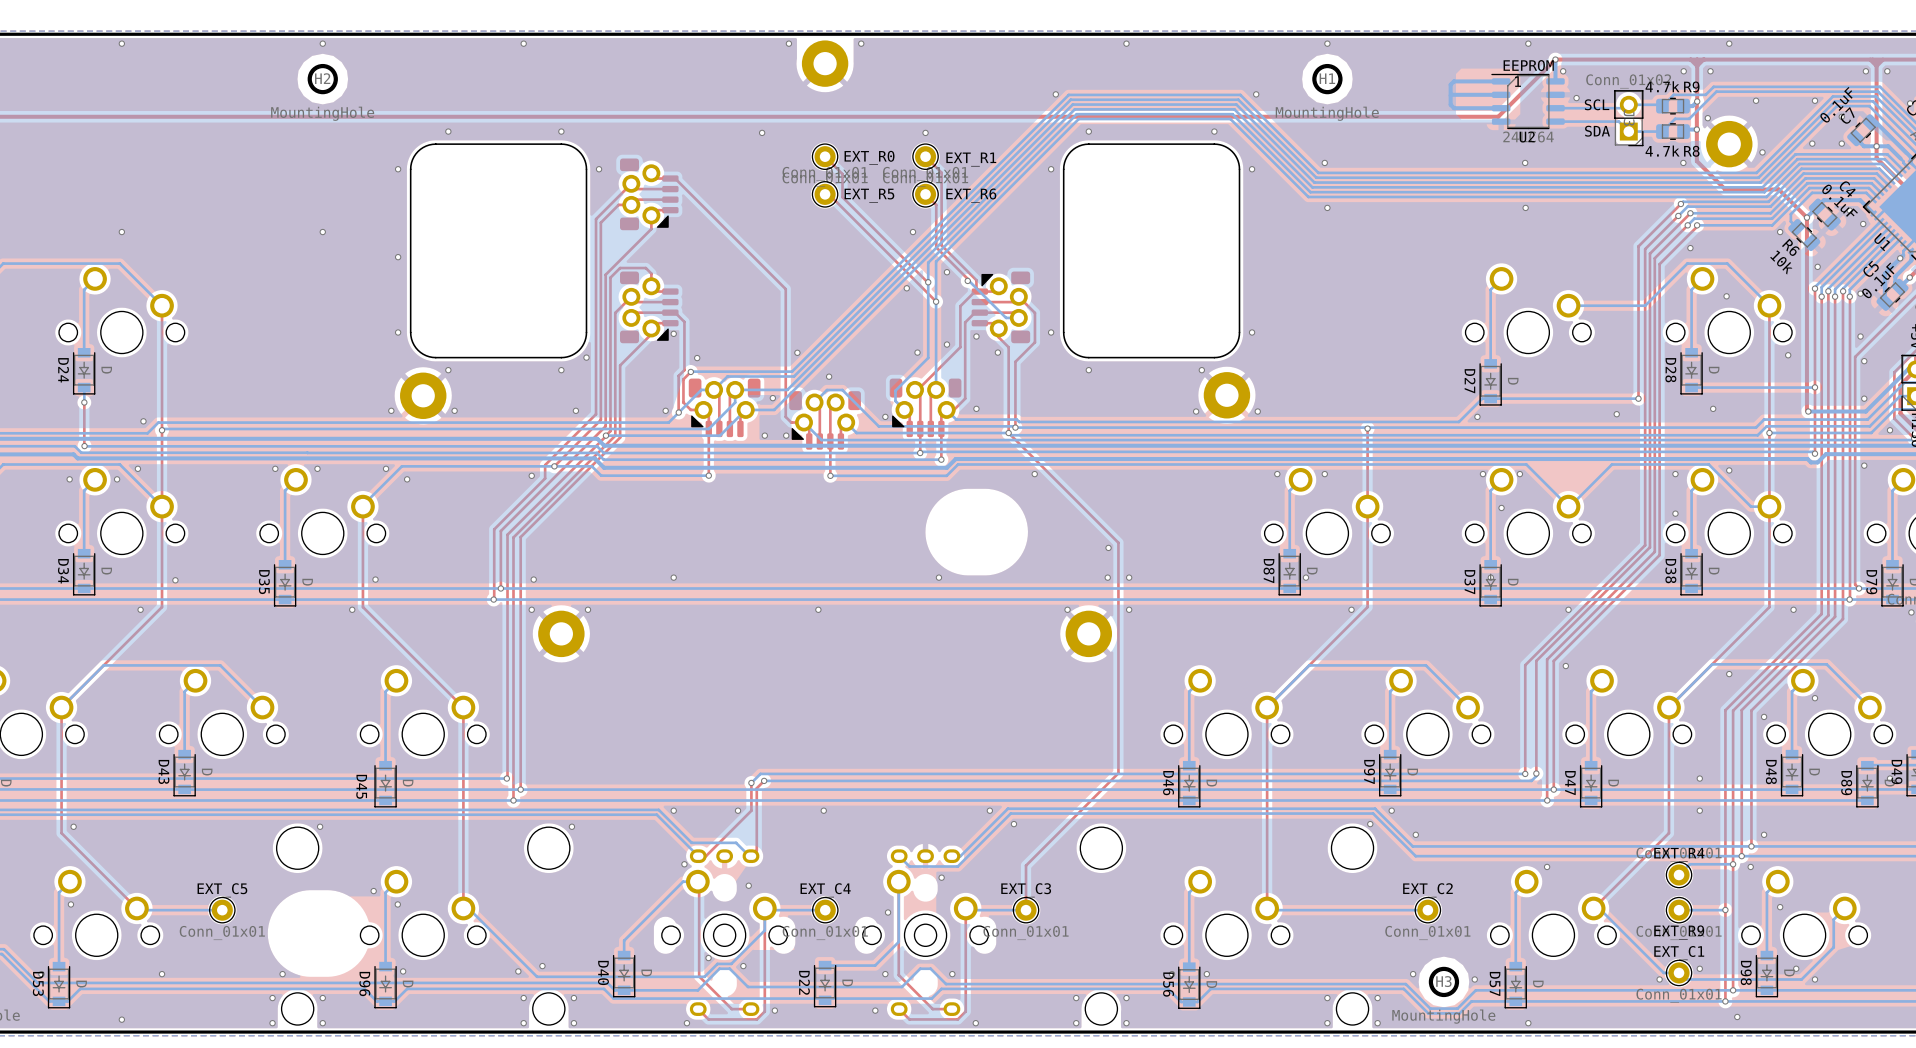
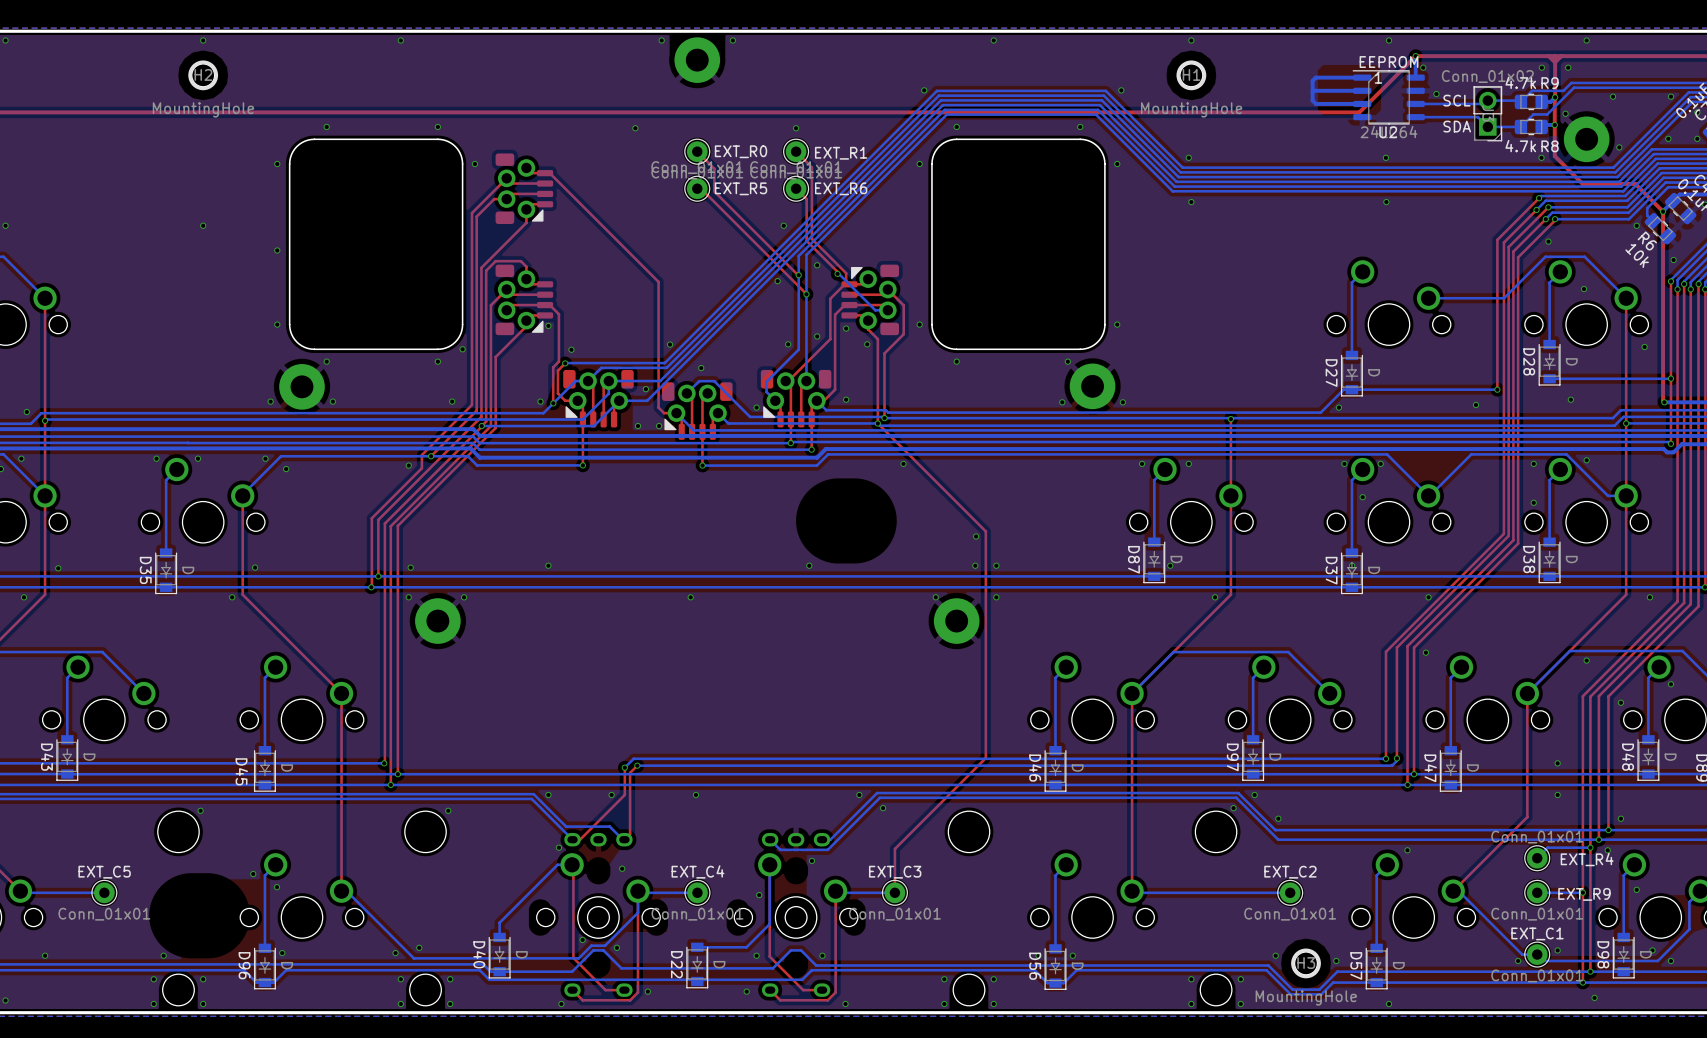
EXT_R4 name position: EXT_R4 (1679, 854) -> EXT_R4 (1587, 859)
EXT_R9 name position: EXT_R9 (1679, 932) -> EXT_R9 (1584, 894)

